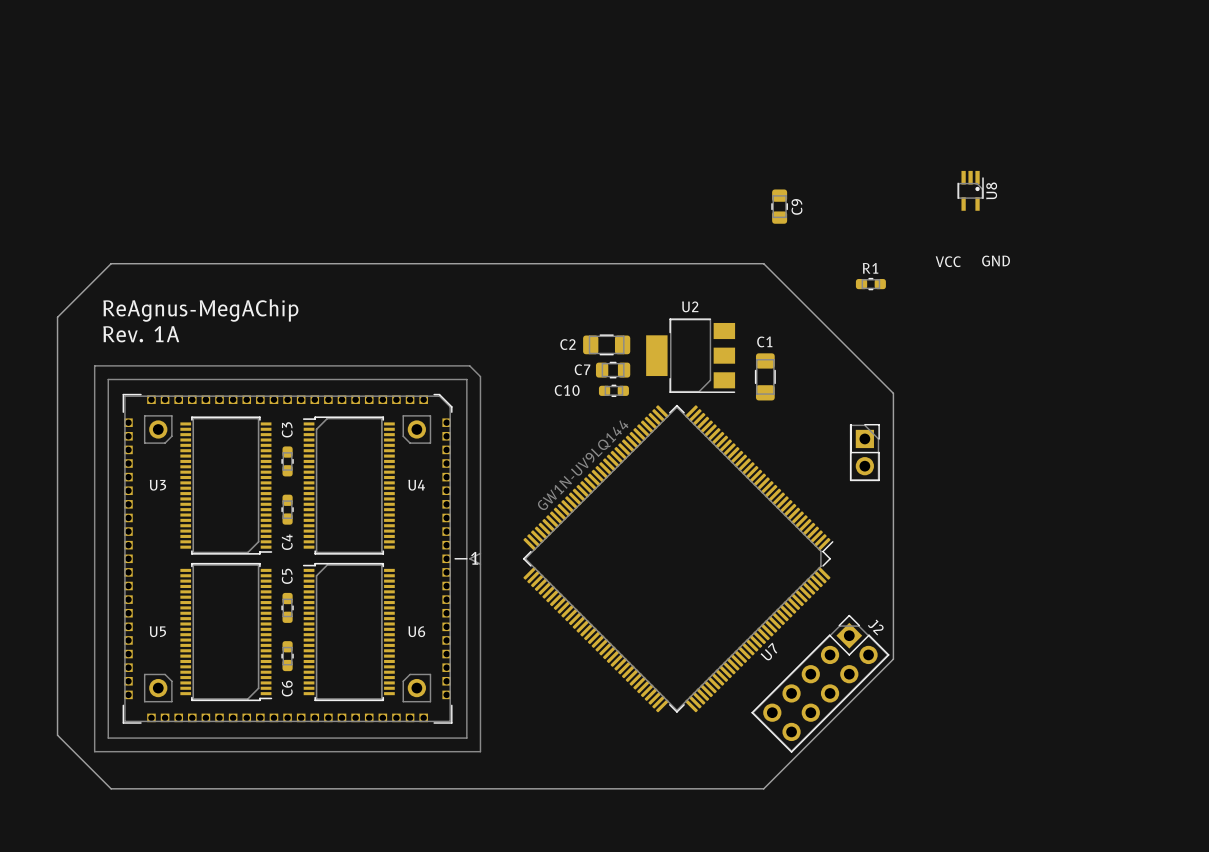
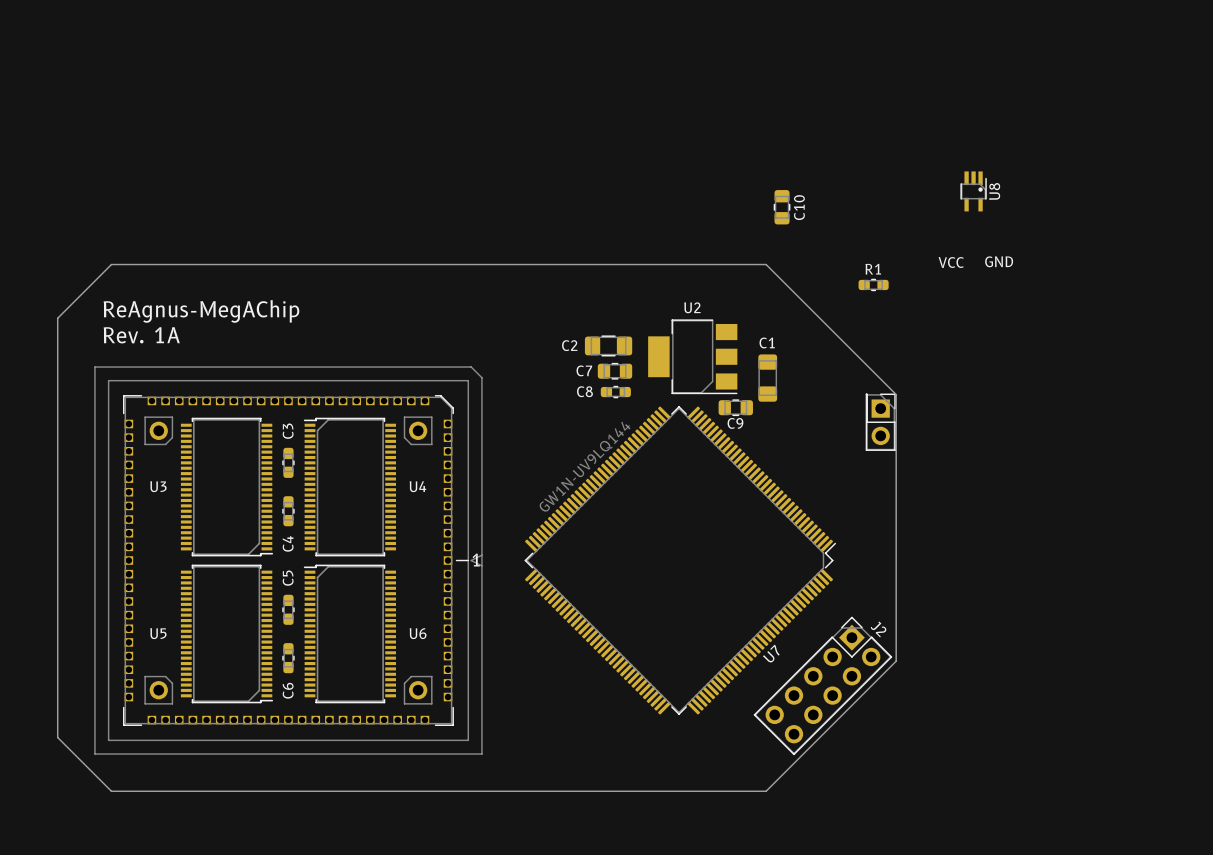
C9 name: C9 (796, 206) -> C10 (799, 207)
C1 footprint: [754, 353, 776, 401] -> [758, 354, 778, 402]
C10 name: C10 (567, 390) -> C8 (584, 391)
C9: none -> (735, 407)
part position: (864, 452) -> (880, 422)

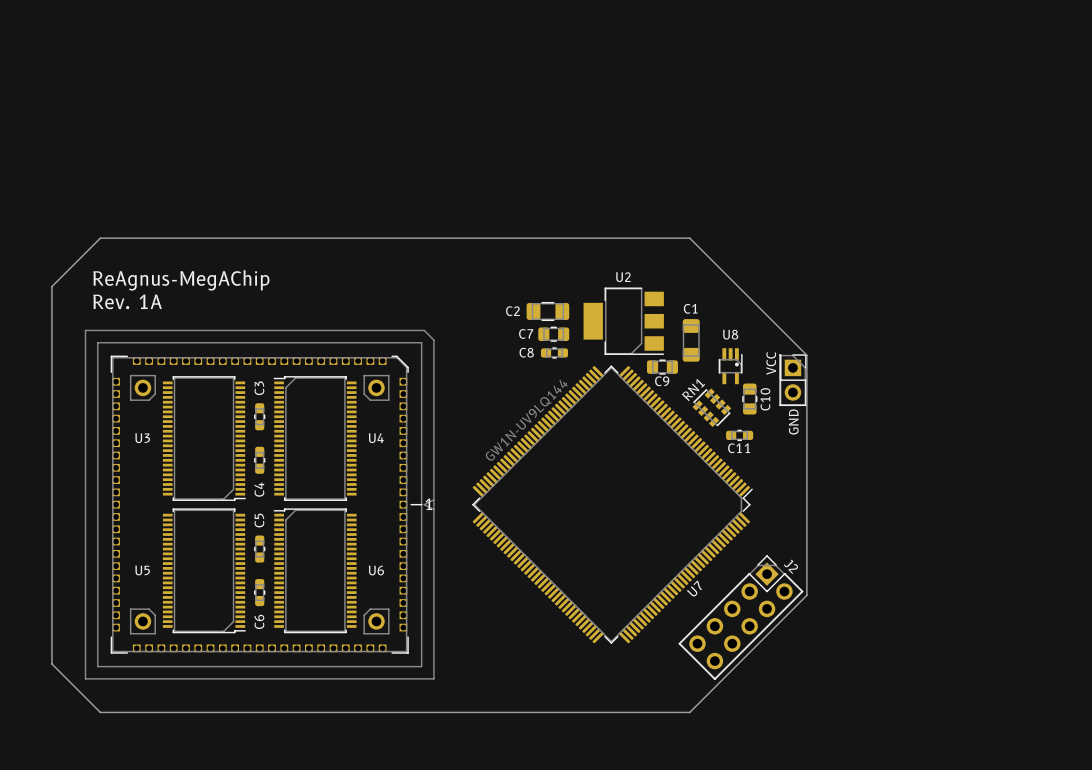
U8 position: (973, 191) -> (730, 366)
U8 name rotation: 0° (994, 191) -> 90° clockwise (730, 334)
U8 name position: U8 (994, 191) -> U8 (730, 334)
C10 position: (782, 207) -> (749, 399)
text rotation: 0° (999, 261) -> 90° counterclockwise (793, 421)
text position: GND (999, 261) -> GND (793, 421)
text rotation: 0° (951, 262) -> 90° counterclockwise (771, 363)
text position: VCC (951, 262) -> VCC (771, 363)
R1: (873, 284) -> none
RN1: none -> (711, 407)
C11: none -> (739, 435)

